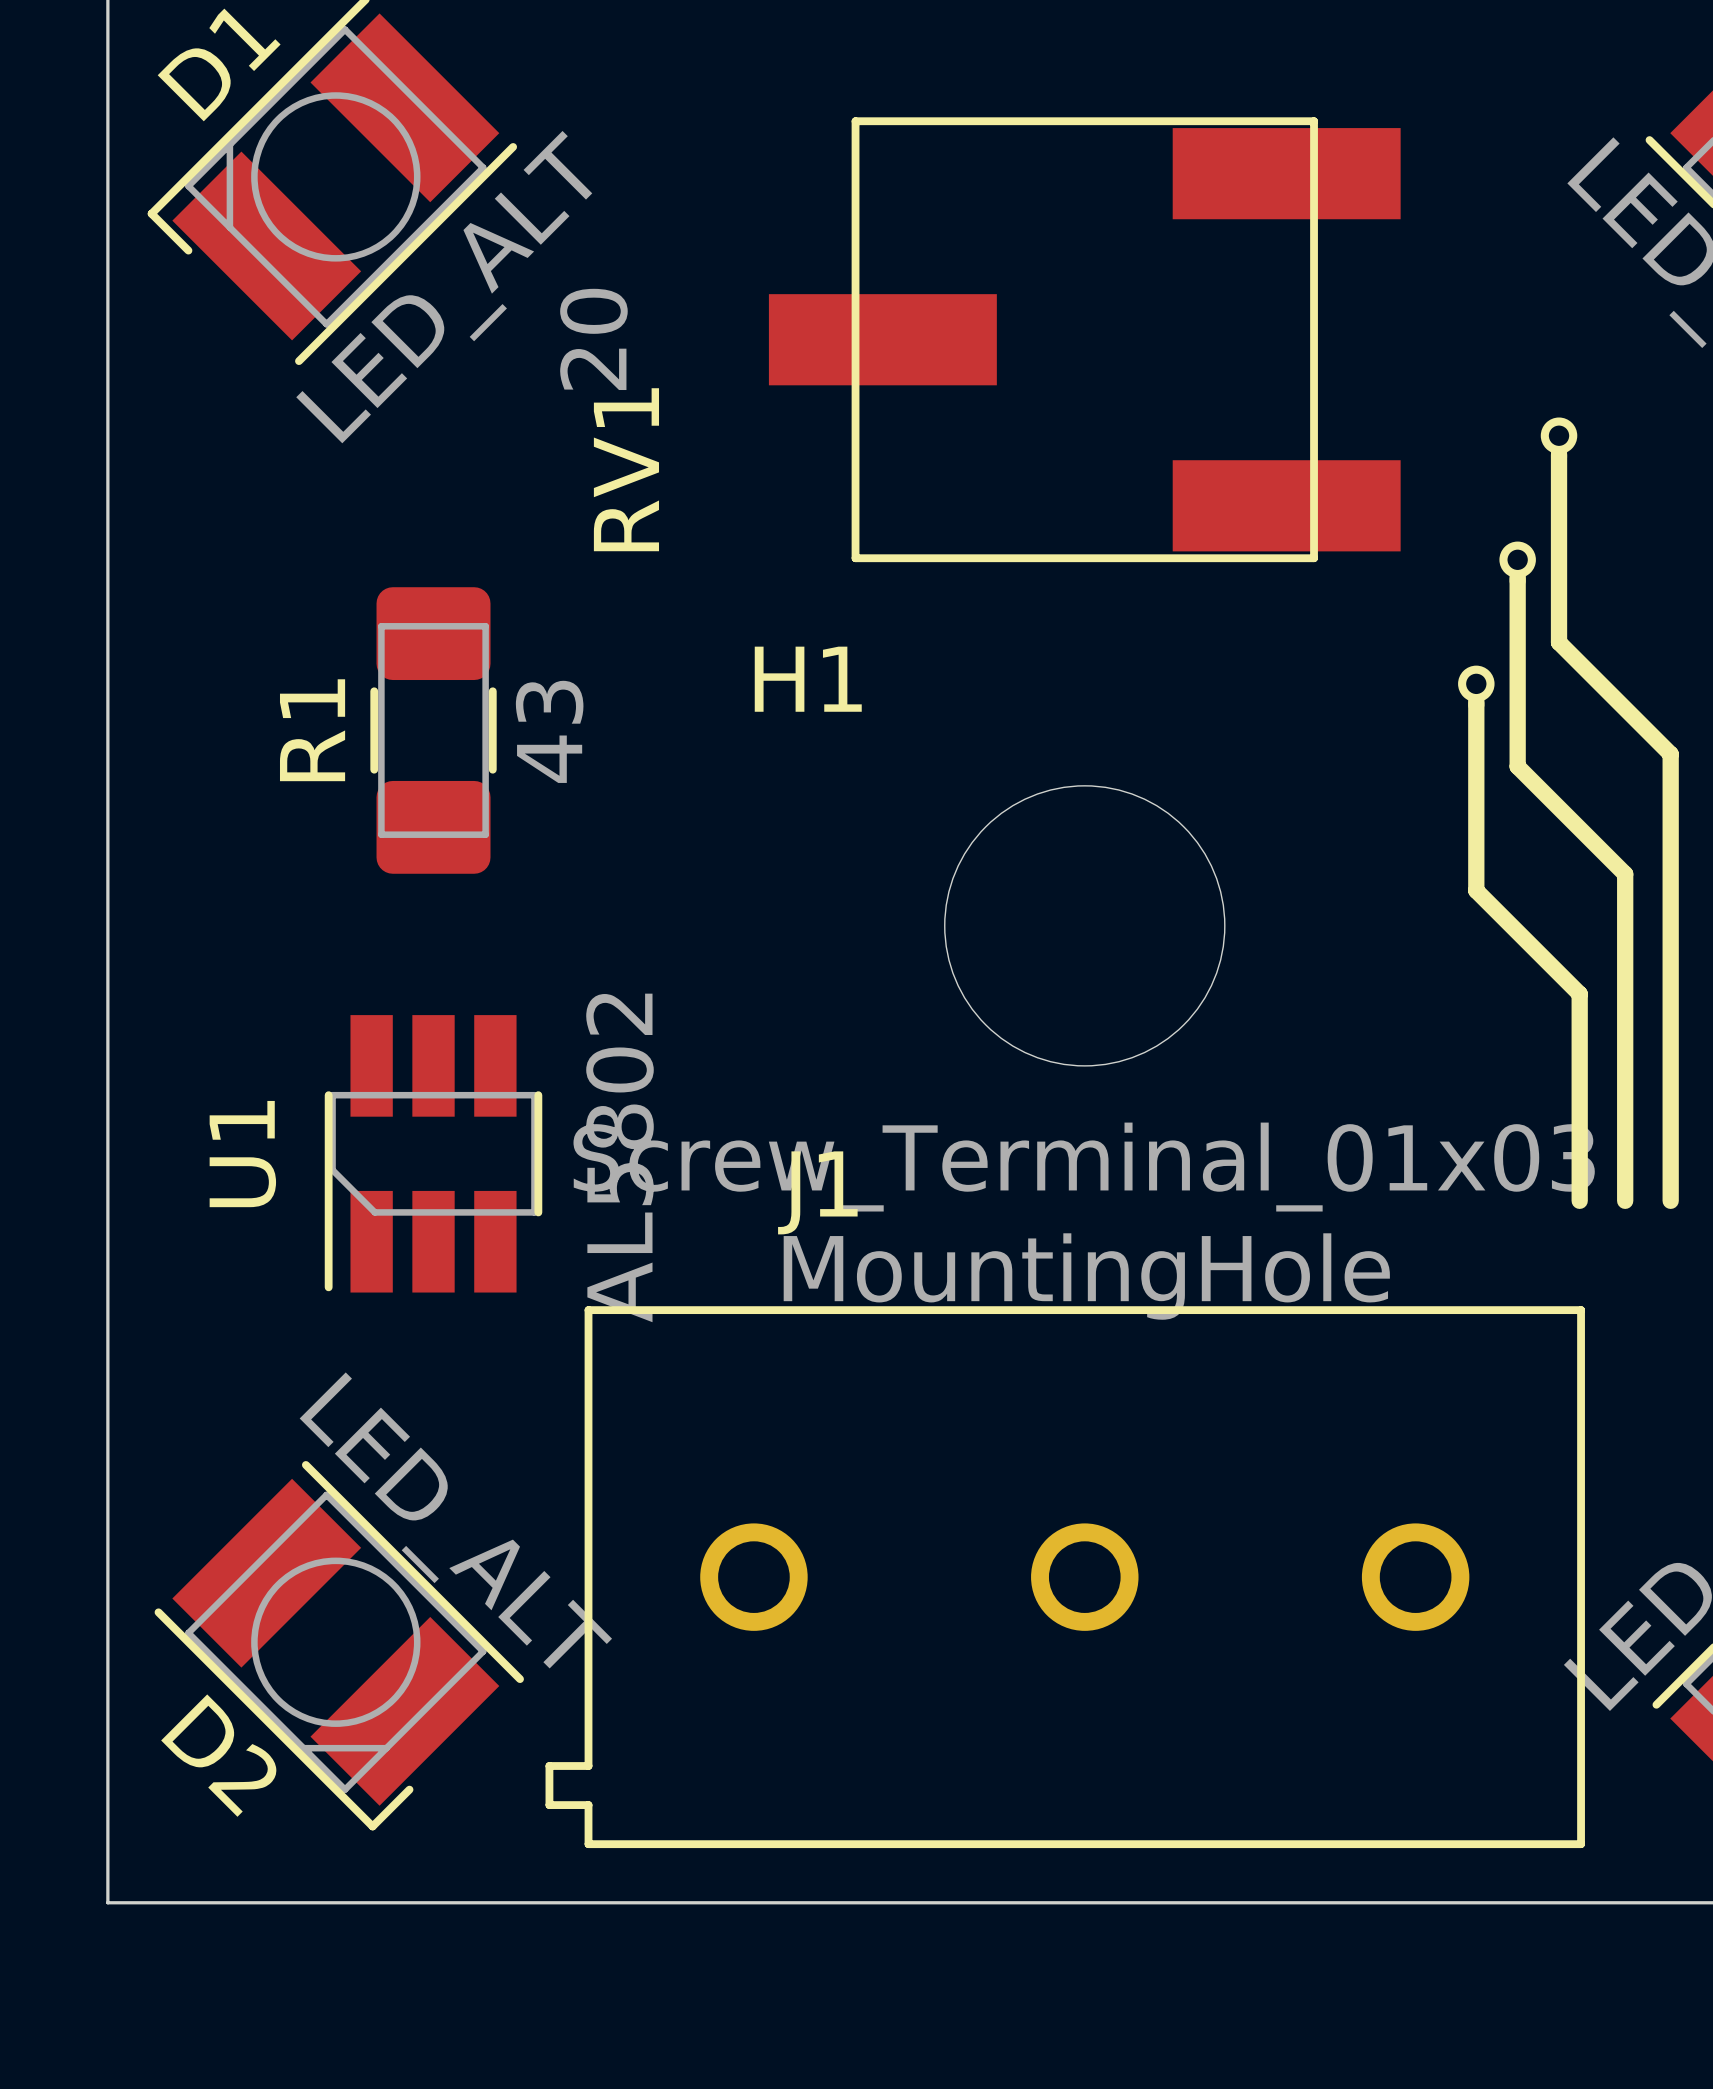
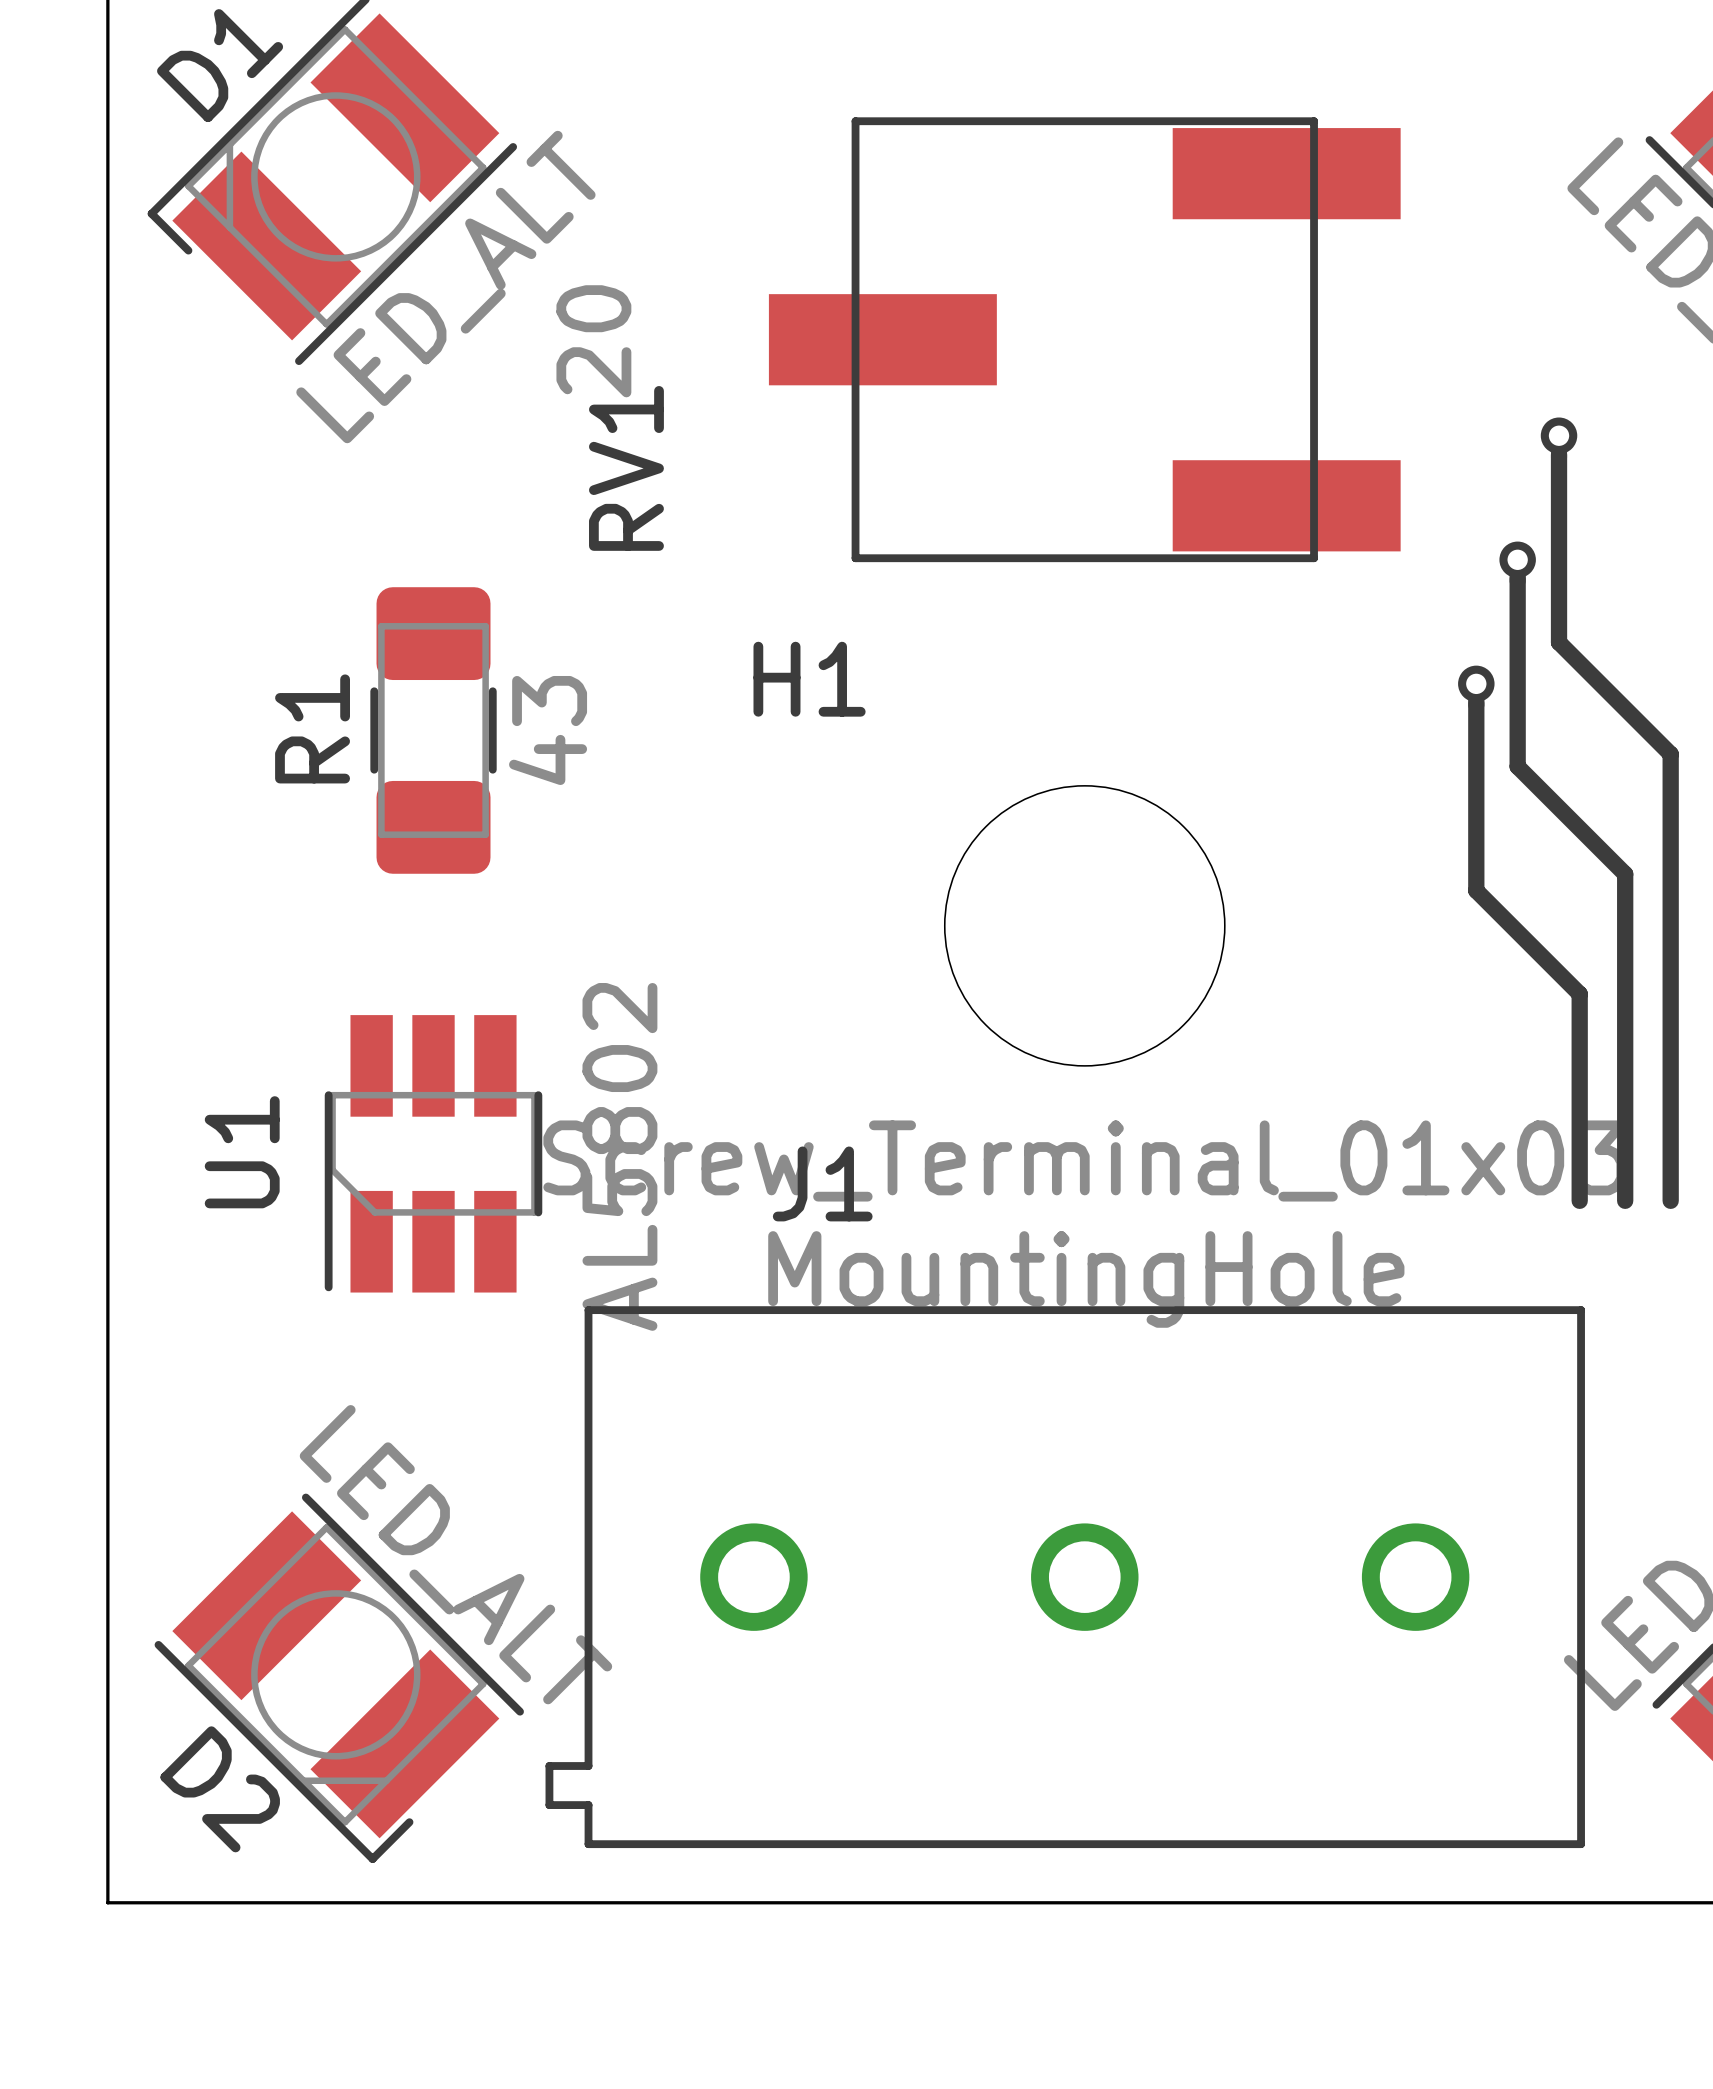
D2 position: (339, 1645) -> (339, 1678)

